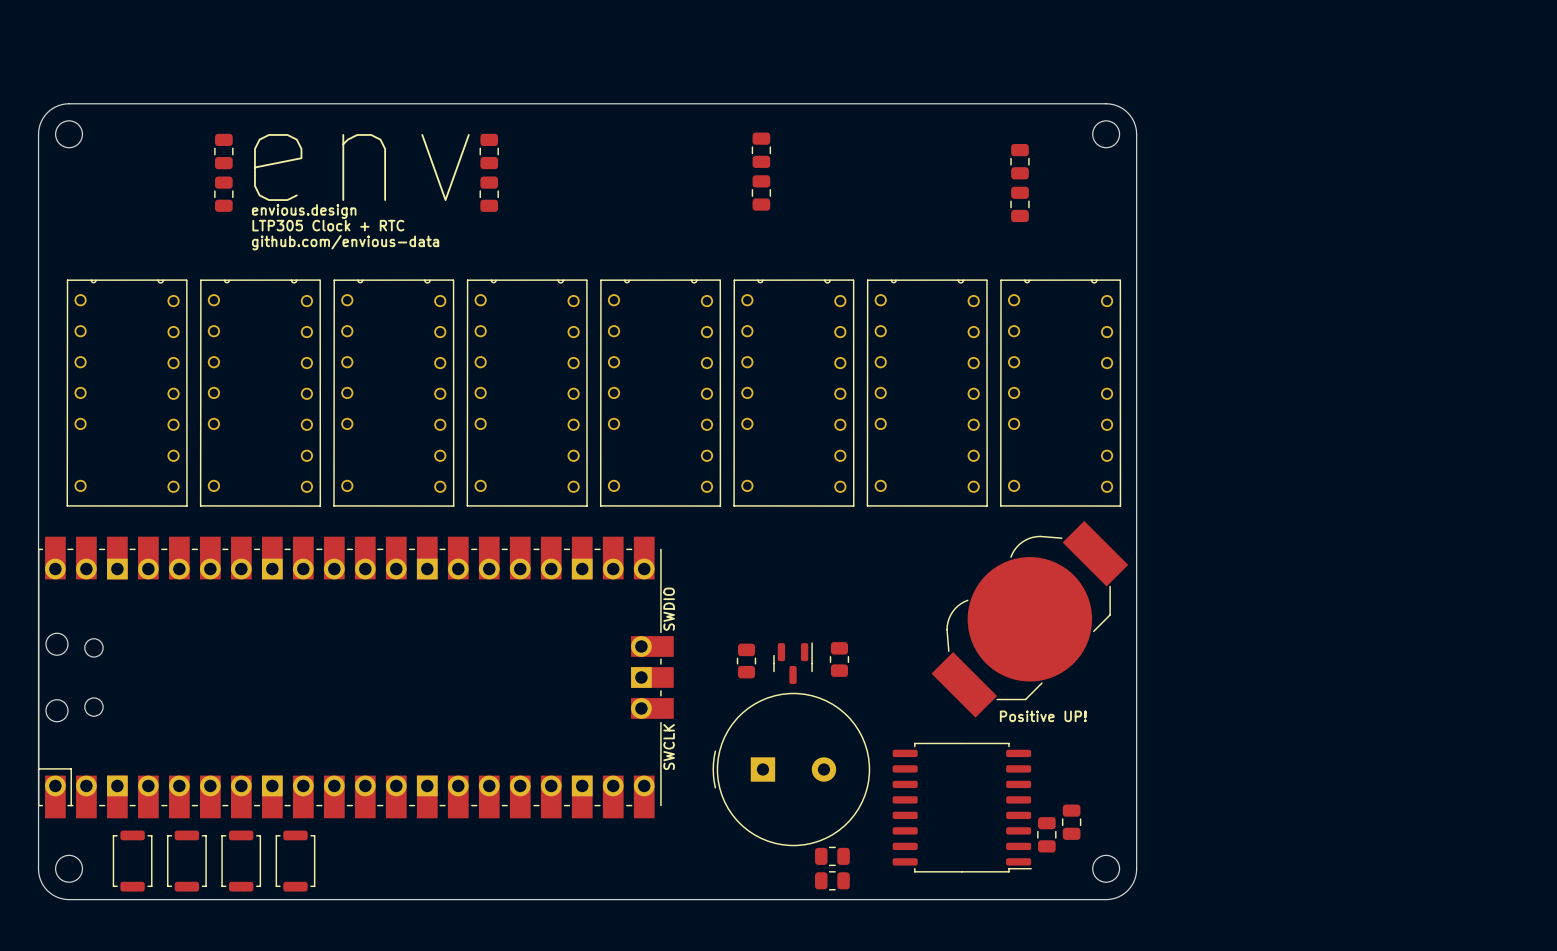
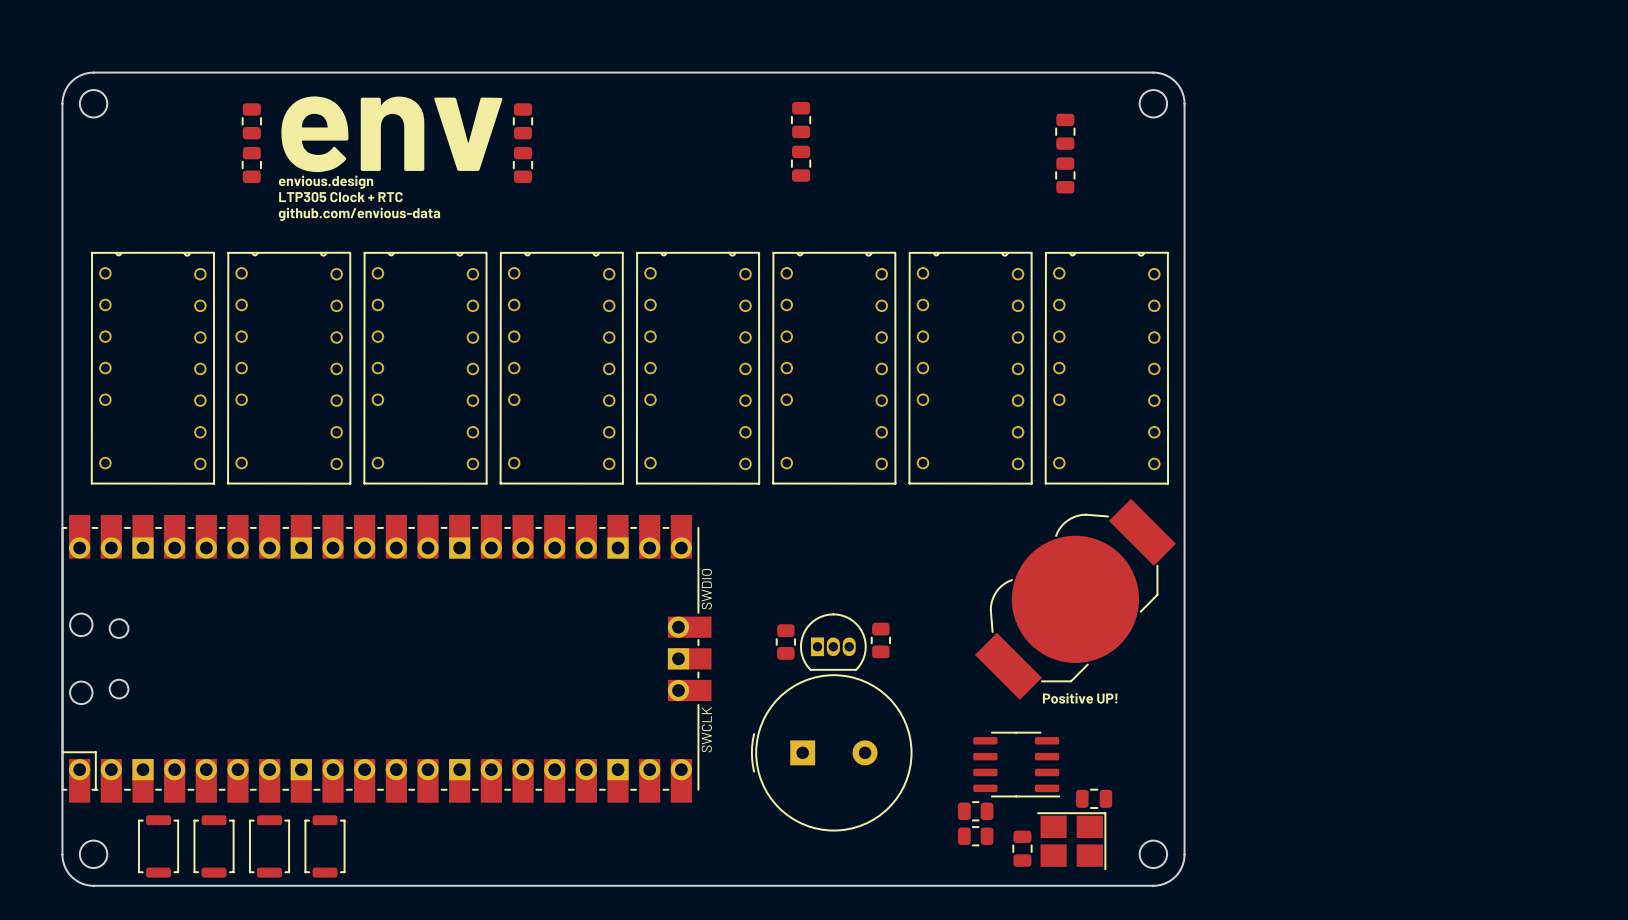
part footprint: [773, 642, 813, 685] -> [800, 613, 867, 671]
part: none -> (1016, 764)
part: (962, 807) -> none
part: none -> (1094, 798)
part: (1071, 822) -> none
part: none -> (975, 811)
part: (1046, 834) -> none
part: none -> (975, 836)
part: none -> (1071, 841)
part: (832, 856) -> none
part: none -> (1022, 848)
part: (832, 880) -> none

